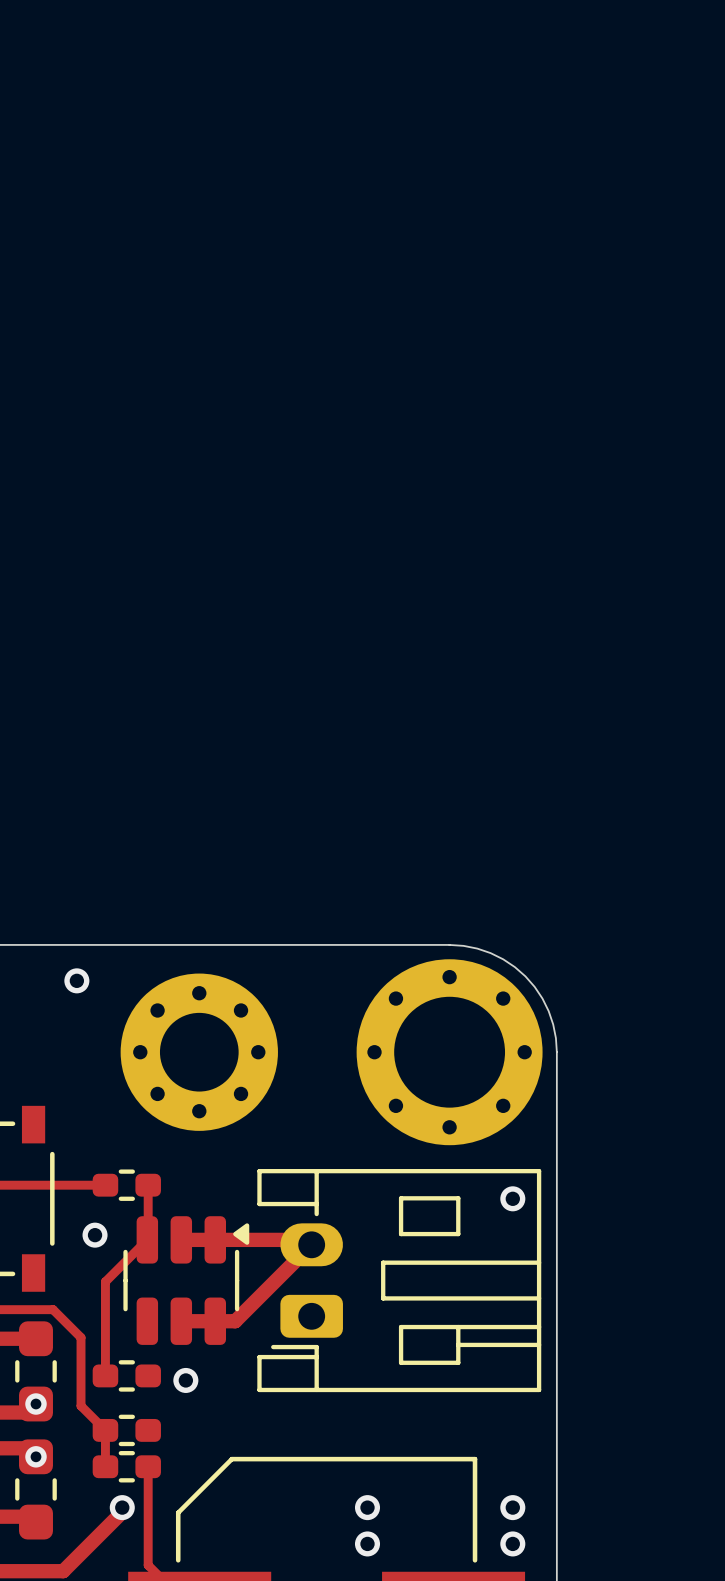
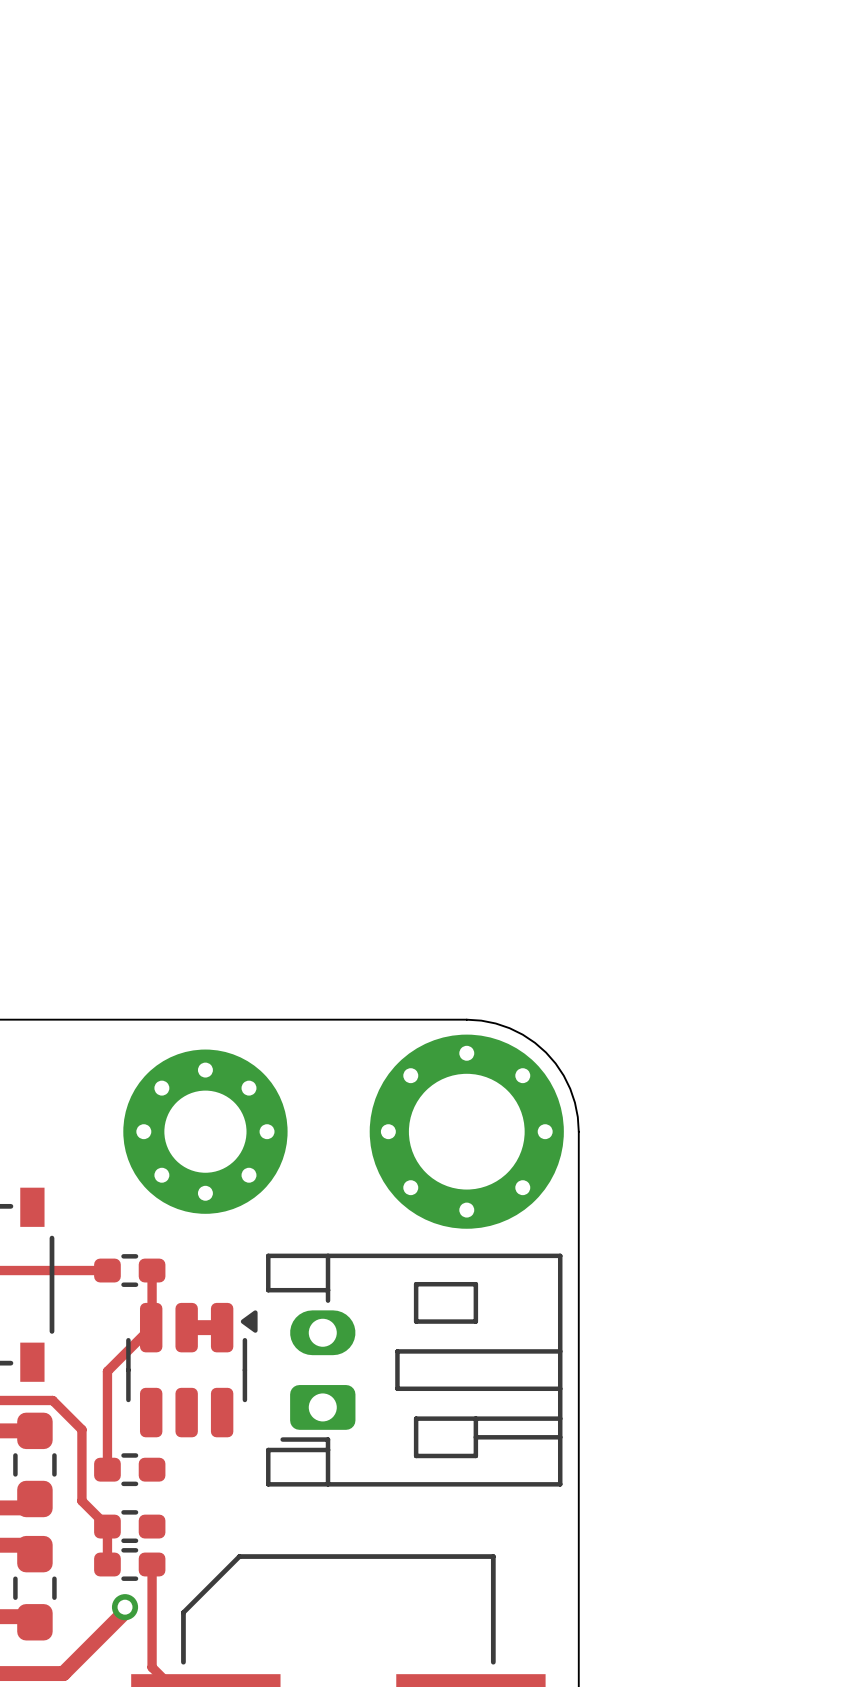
via: (76, 980) -> none
via: (512, 1198) -> none
via: (95, 1235) -> none
track: (215, 1239) (306, 1239) -> none
track: (311, 1244) (235, 1321) (181, 1321) -> none
via: (185, 1380) -> none
via: (35, 1404) -> none
via: (35, 1456) -> none
via: (367, 1507) -> none
via: (512, 1507) -> none
via: (367, 1543) -> none
via: (512, 1543) -> none

